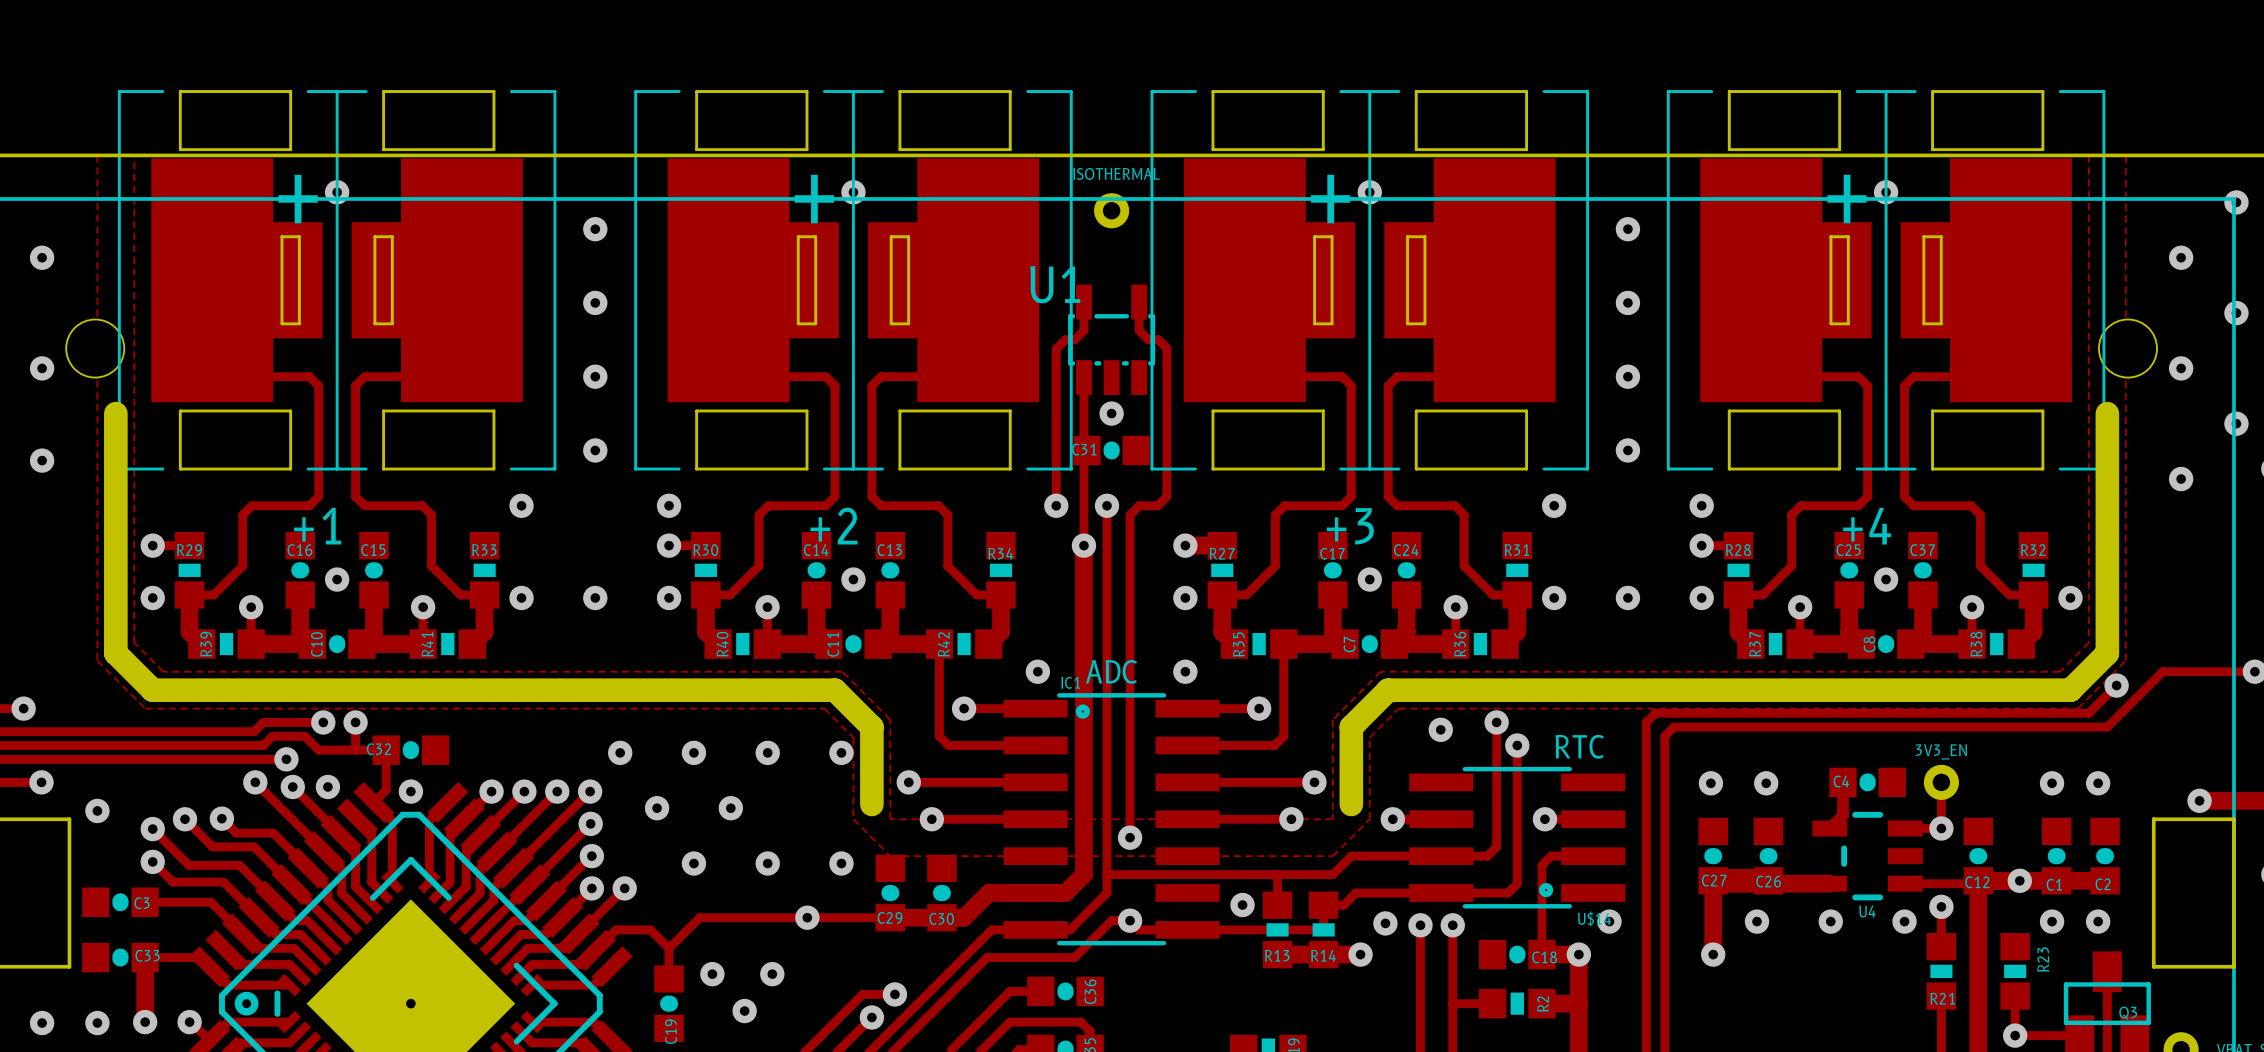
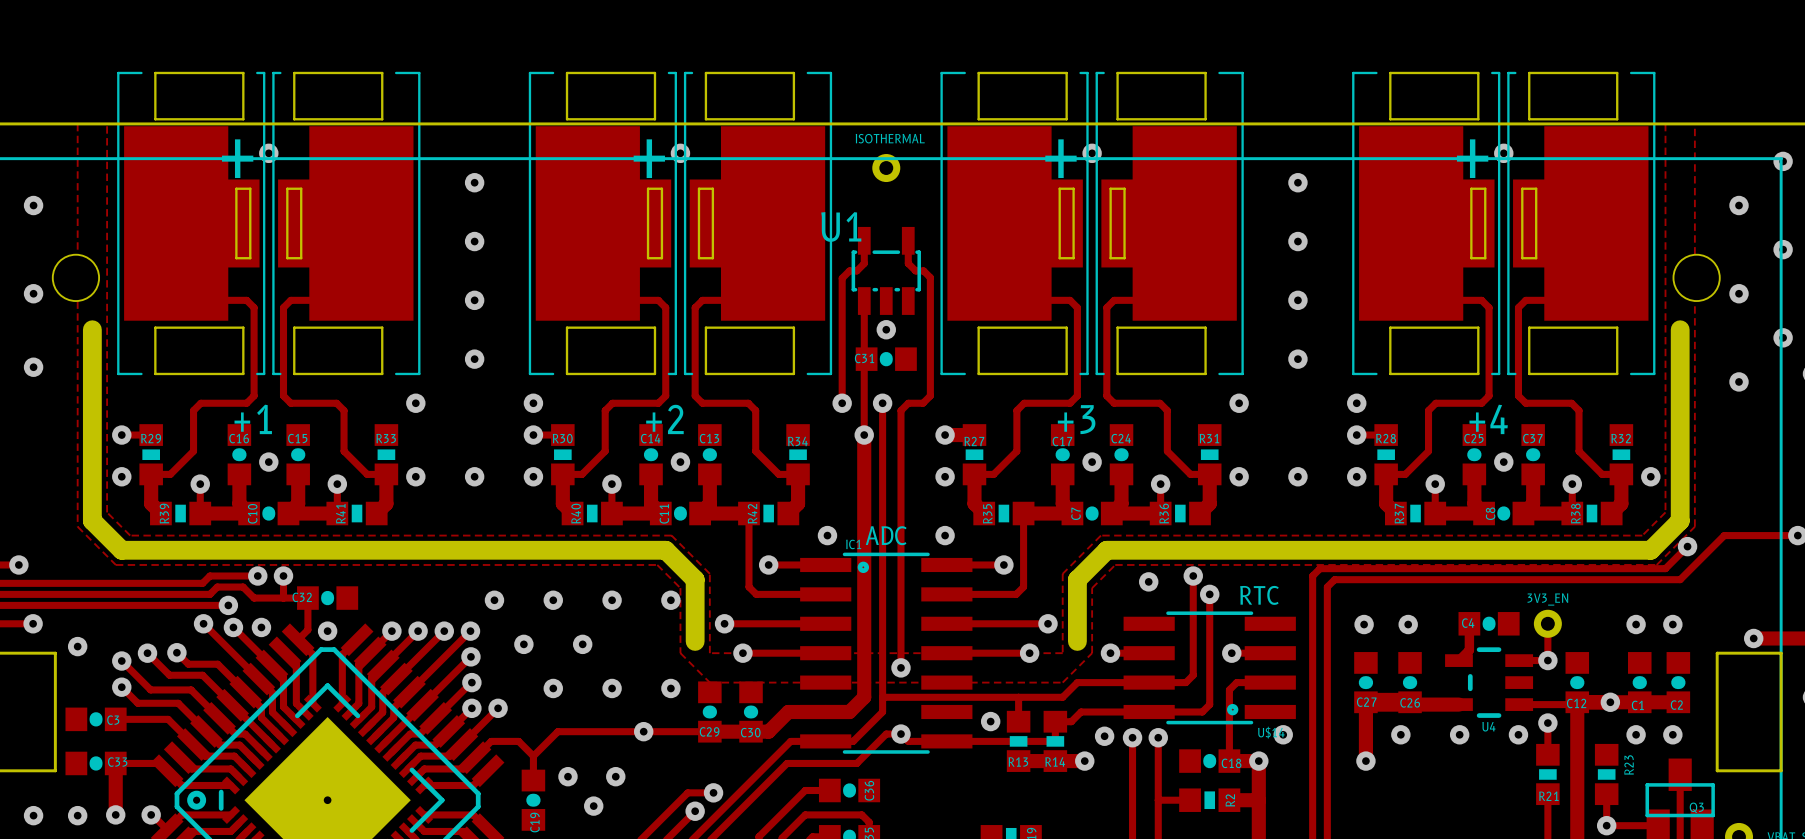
part footprint: [117, 90, 557, 471] -> [117, 71, 421, 376]
part footprint: [634, 90, 1073, 471] -> [528, 71, 833, 376]
part footprint: [1150, 90, 1590, 471] -> [940, 71, 1244, 376]
part footprint: [1666, 90, 2106, 471] -> [1352, 71, 1656, 376]

